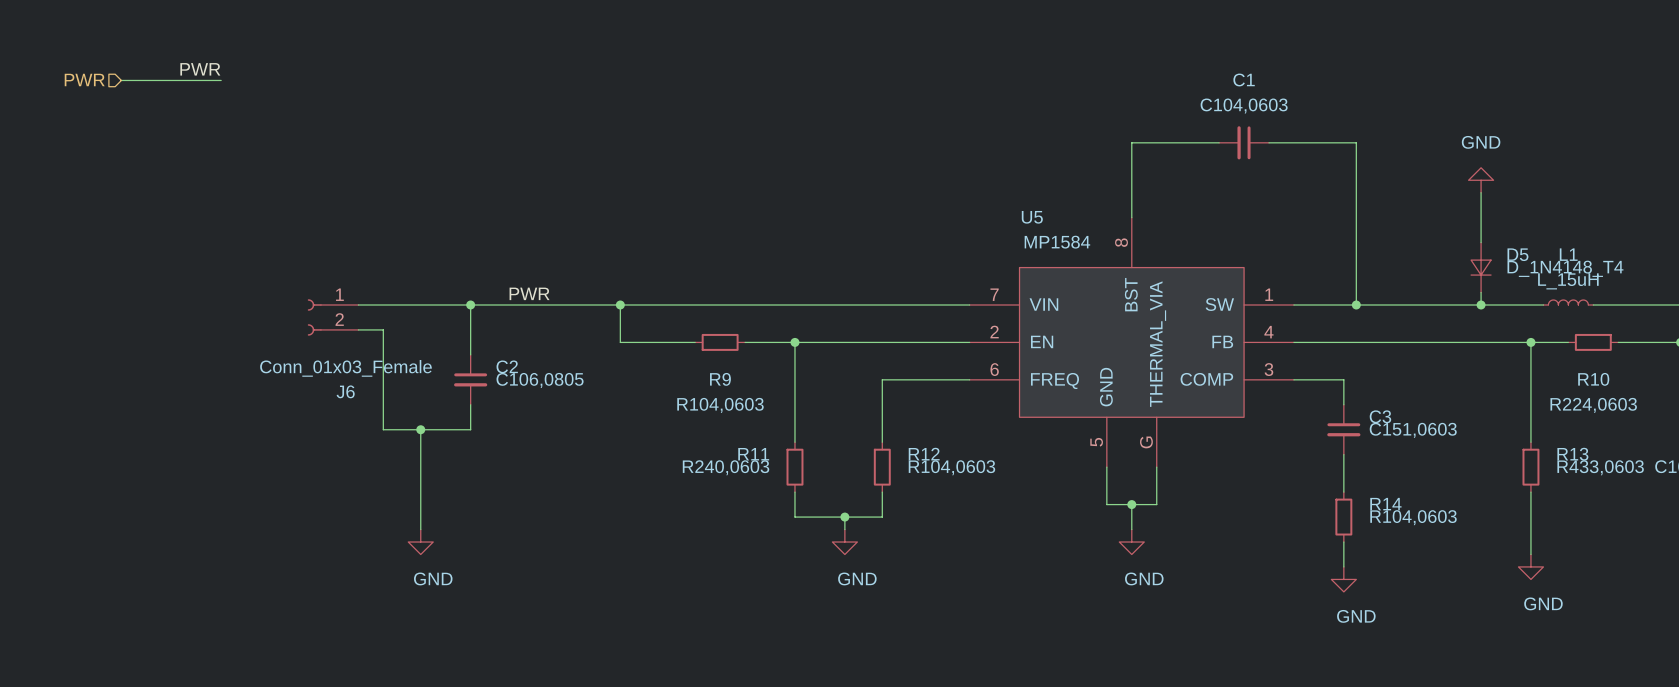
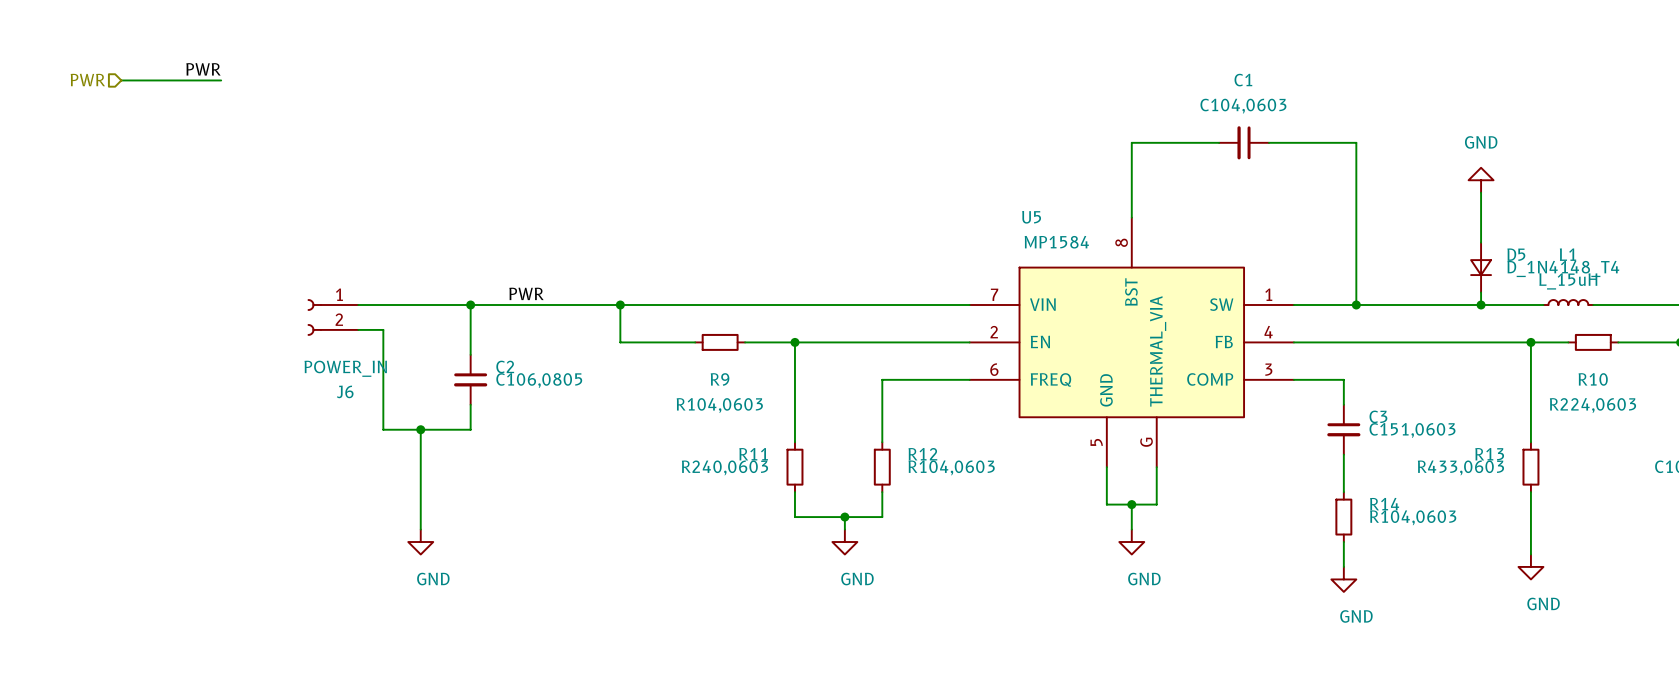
J6 value: Conn_01x03_Female (345, 368) -> POWER_IN (345, 368)
R13 name position: R13 (1572, 454) -> R13 (1489, 454)
R13 value position: R433,0603 (1600, 467) -> R433,0603 (1460, 467)

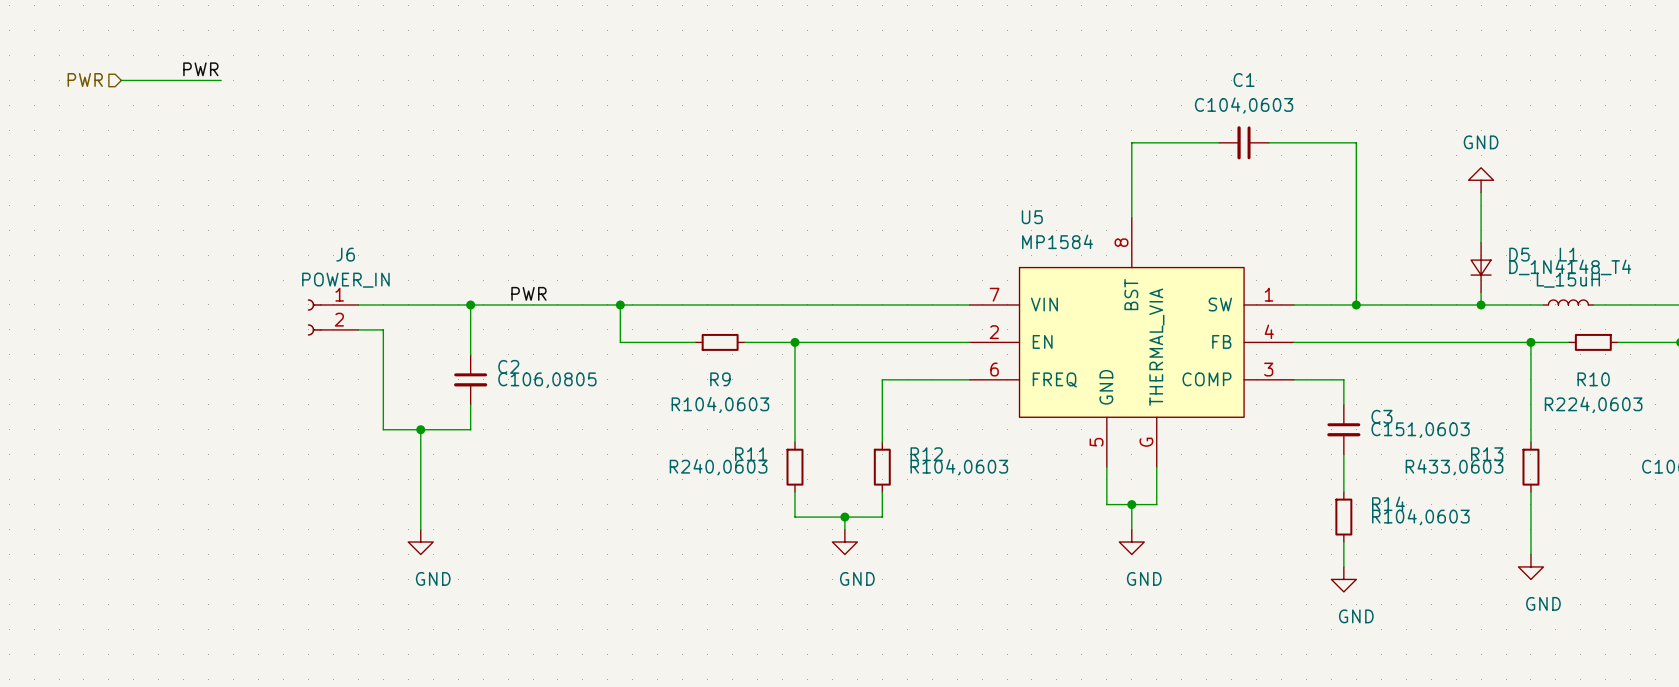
J6 value position: POWER_IN (345, 368) -> POWER_IN (345, 280)
J6 name position: J6 (345, 391) -> J6 (345, 254)

